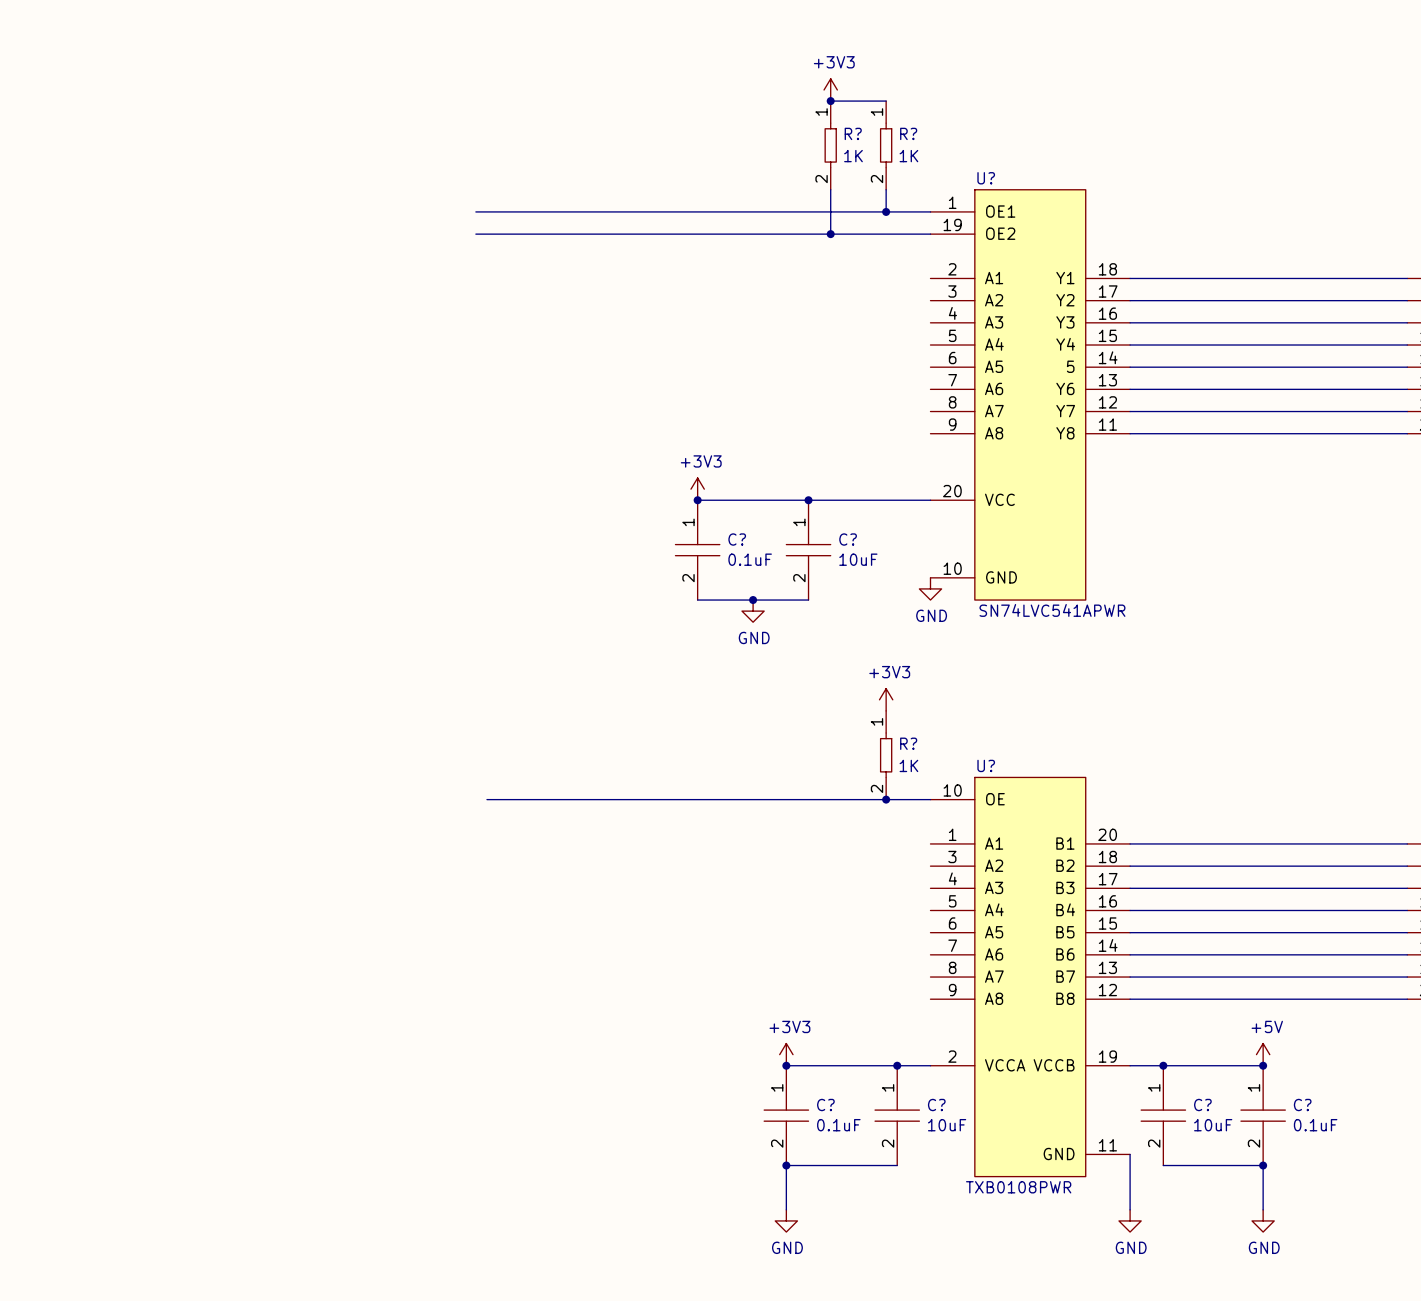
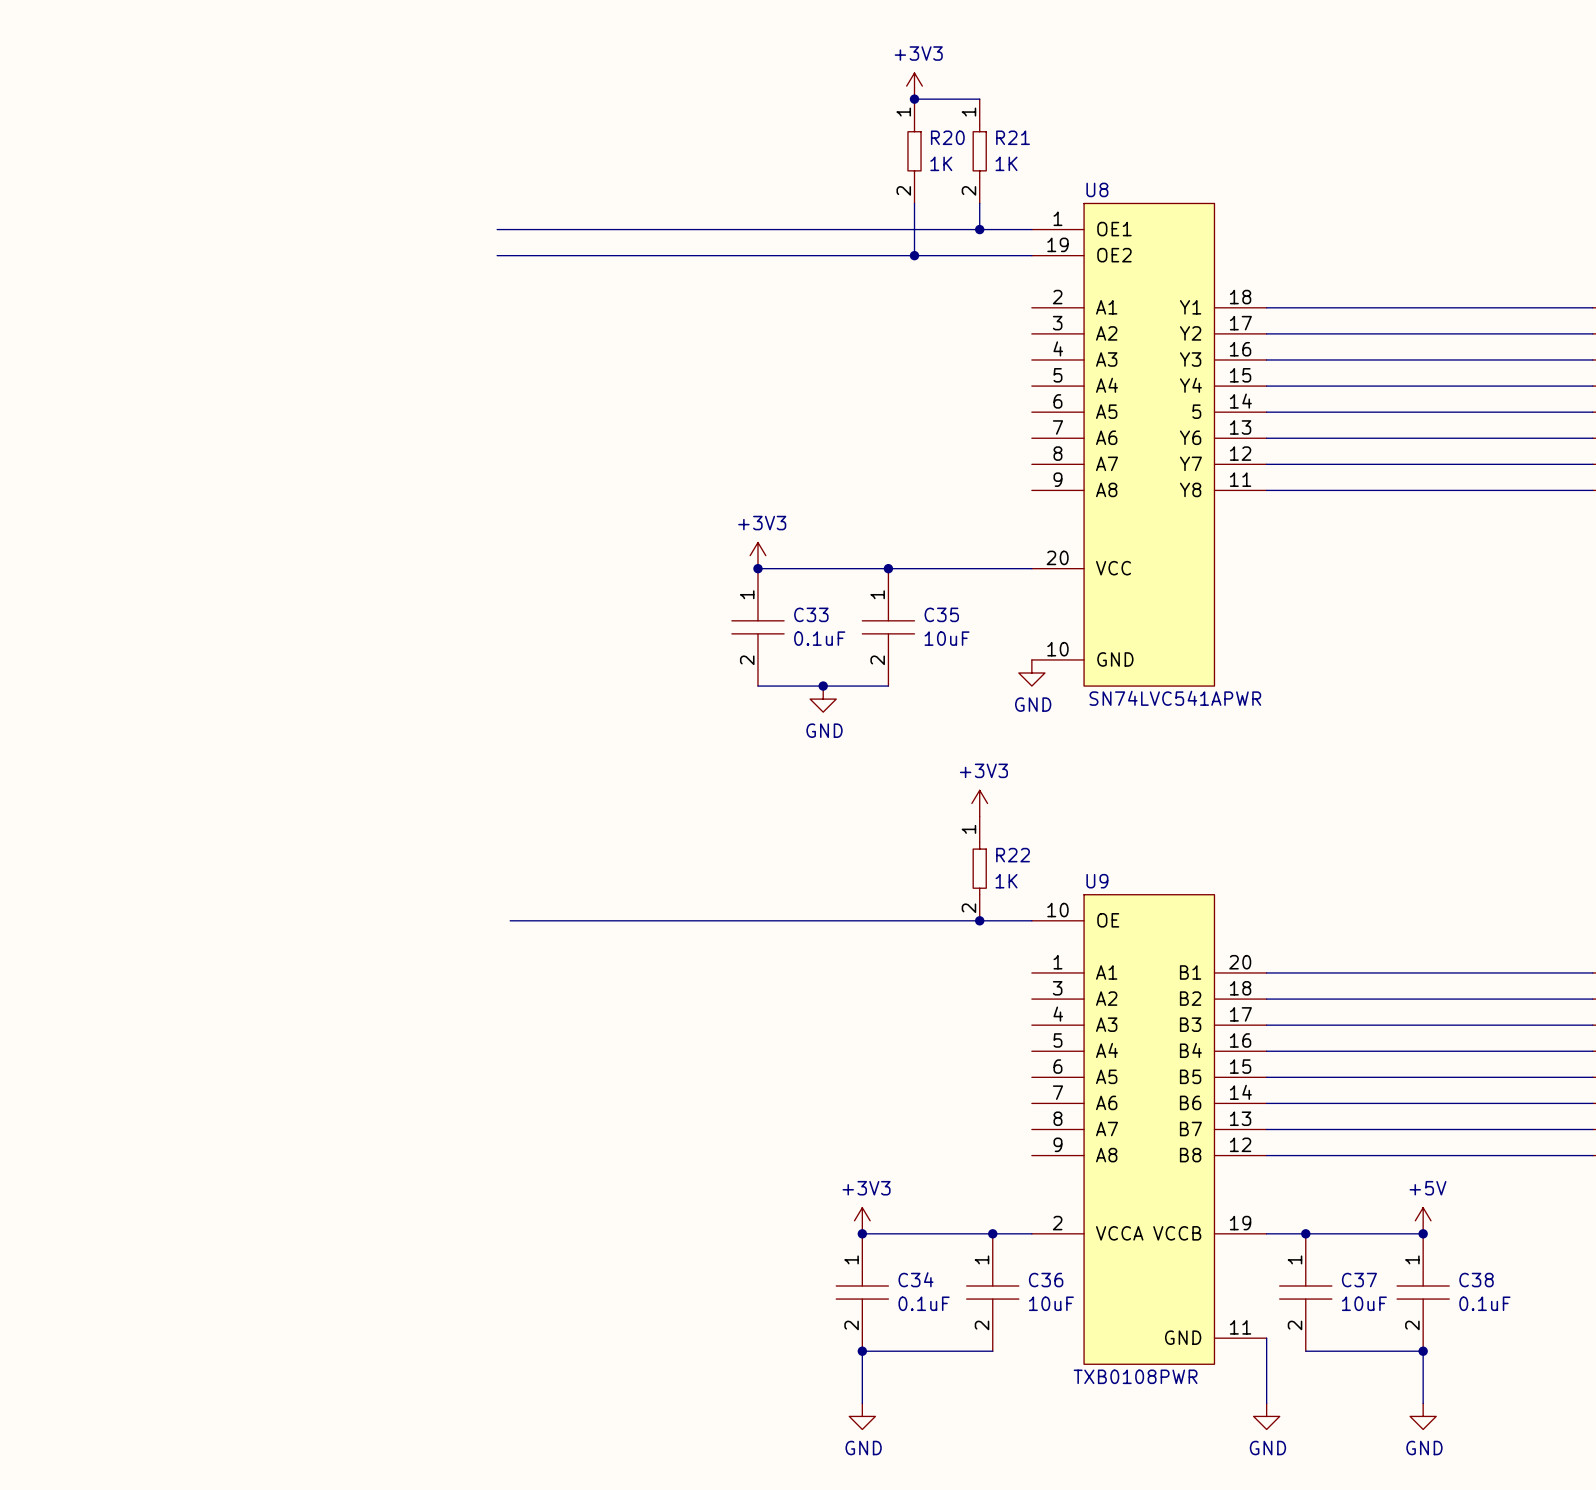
R? name: R? (853, 133) -> R20 (947, 137)
R? name: R? (908, 133) -> R21 (1013, 137)
U? name: U? (986, 178) -> U8 (1097, 189)
C? name: C? (737, 539) -> C33 (811, 614)
C? name: C? (848, 539) -> C35 (941, 614)
R? name: R? (908, 743) -> R22 (1013, 855)
U? name: U? (986, 765) -> U9 (1097, 881)
C? name: C? (825, 1105) -> C34 (916, 1279)
C? name: C? (936, 1105) -> C36 (1046, 1280)
C? name: C? (1202, 1105) -> C37 (1359, 1280)
C? name: C? (1302, 1105) -> C38 (1476, 1280)

